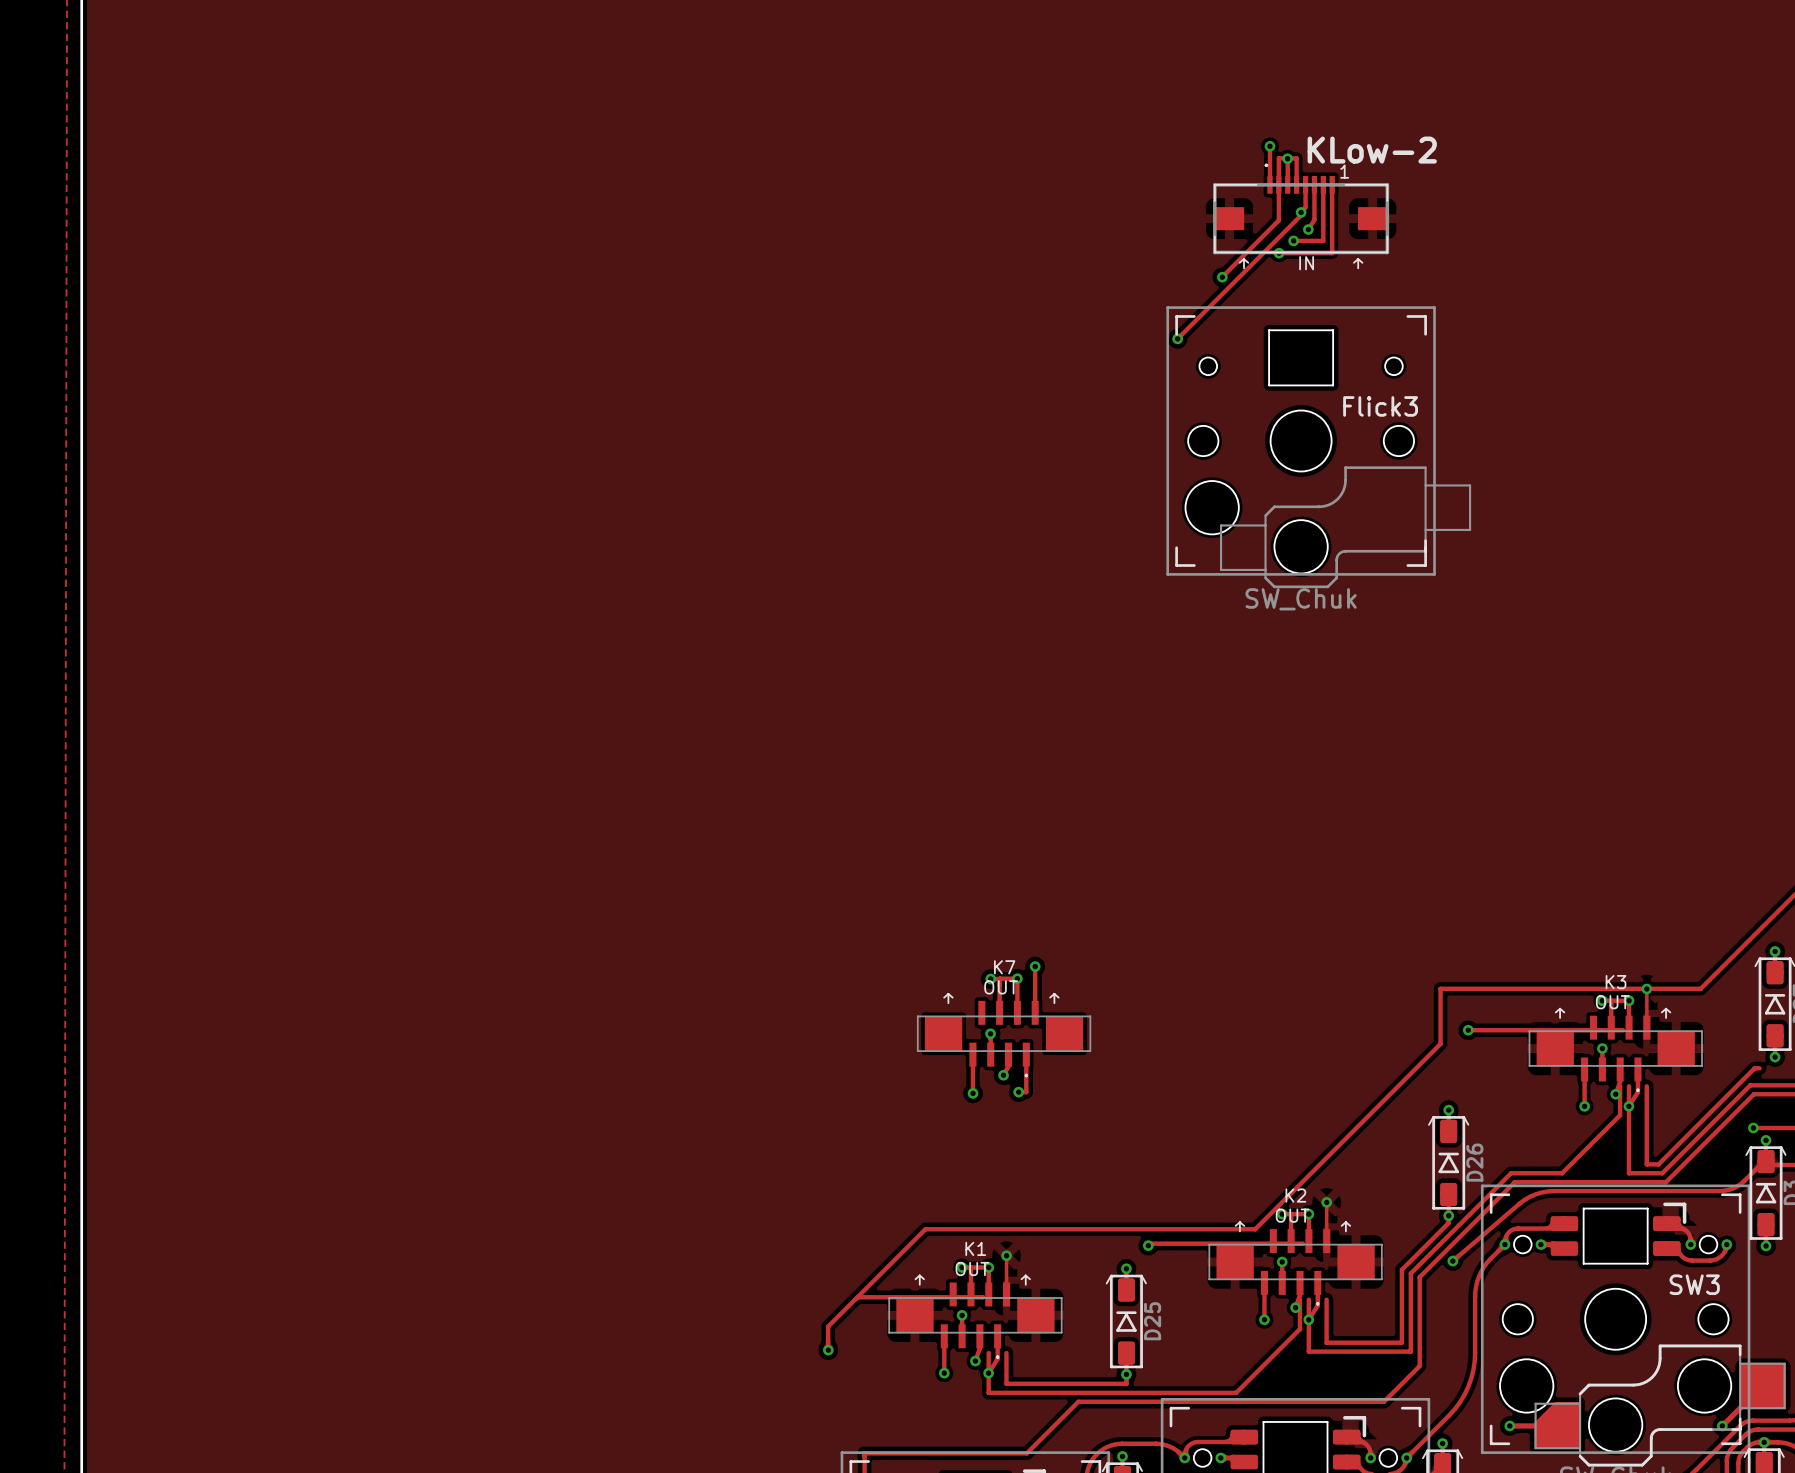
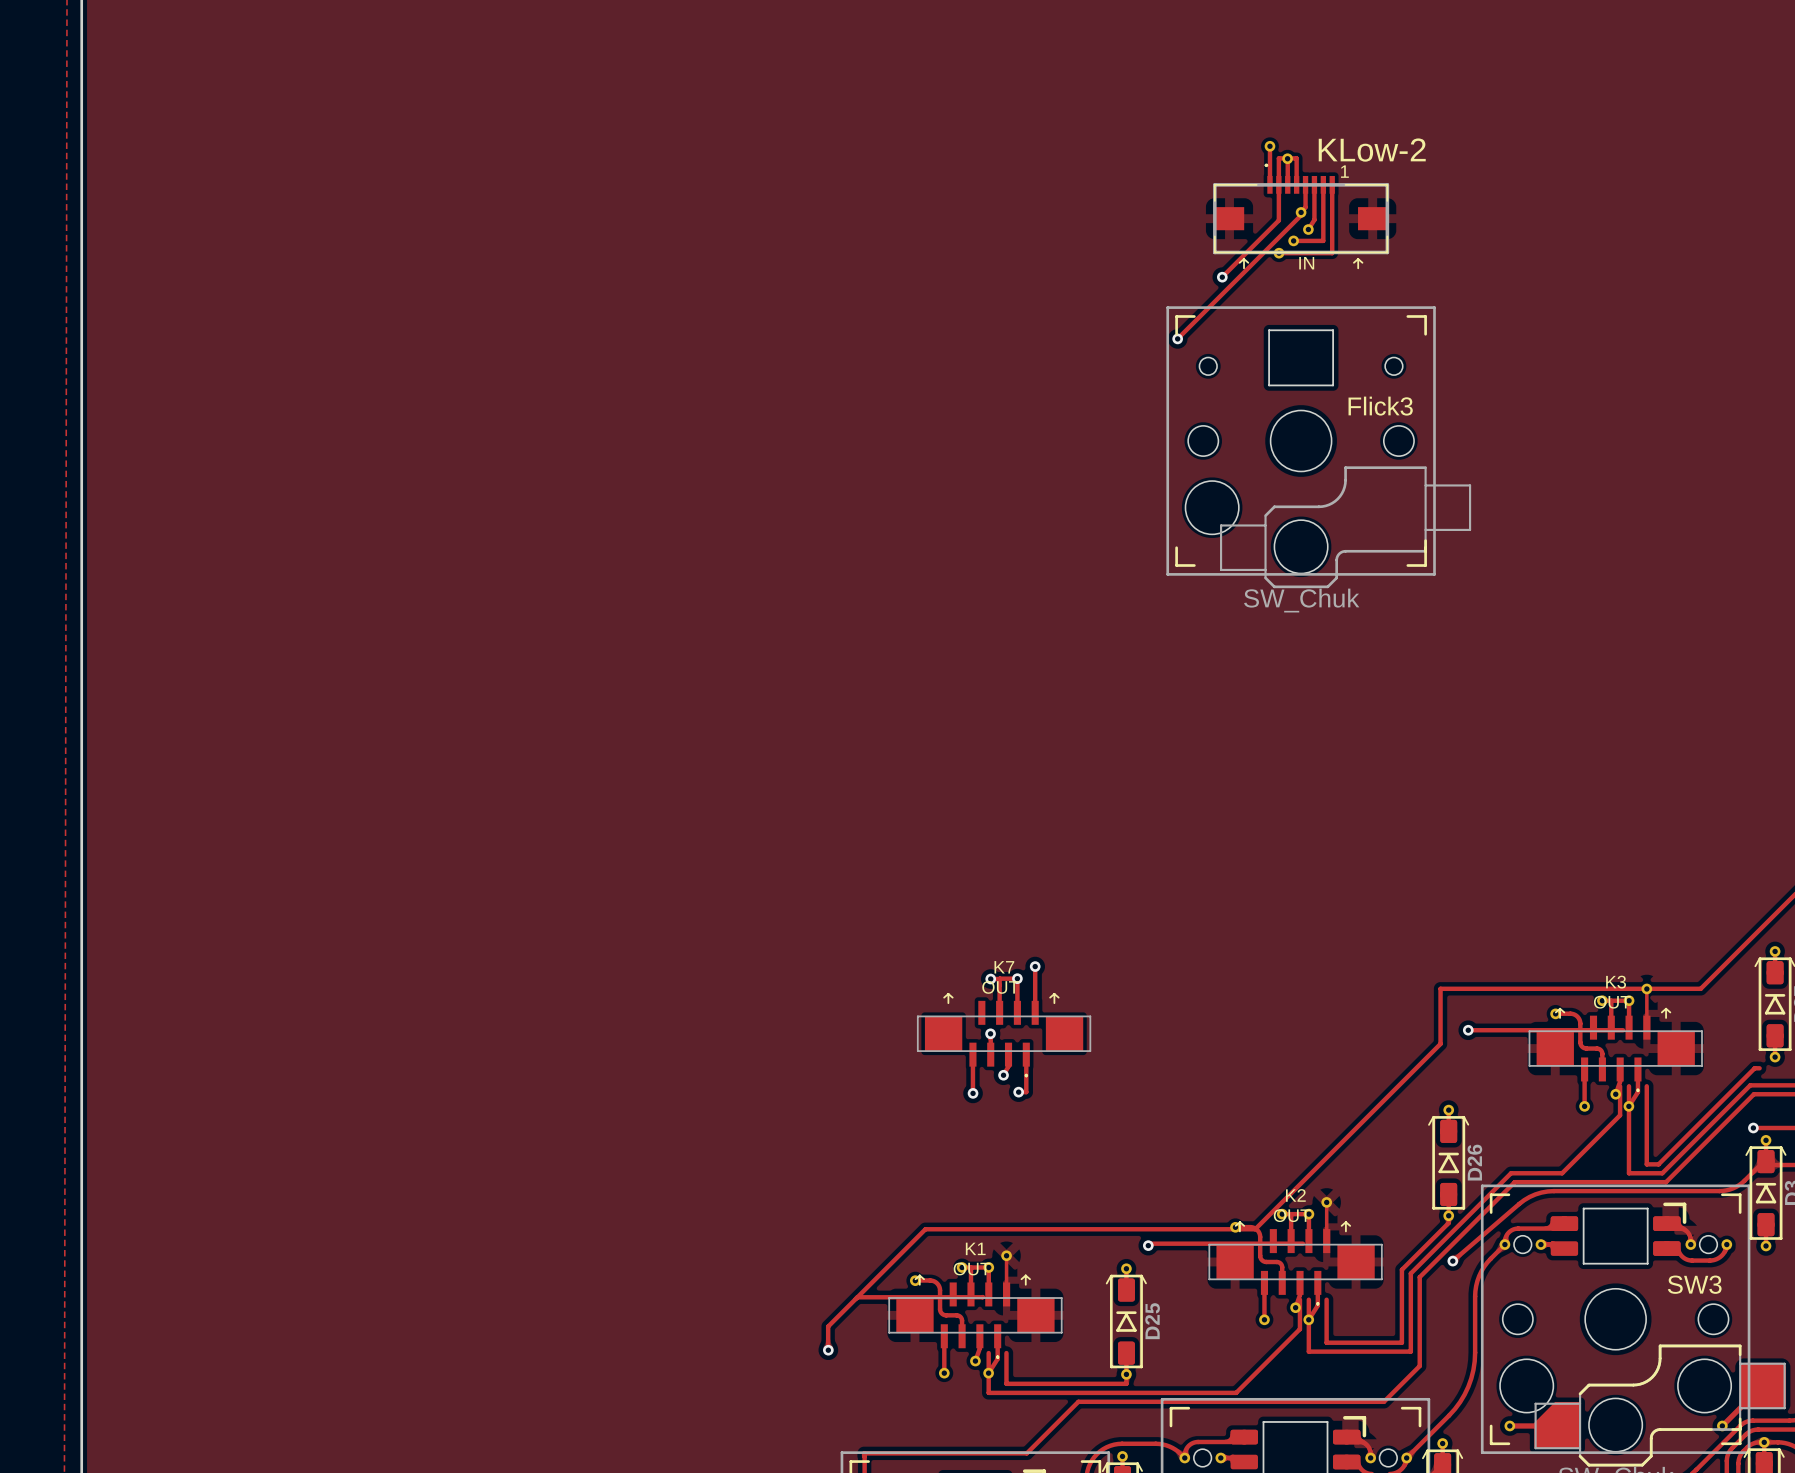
K3 footprint: [1528, 983, 1703, 1112] -> [1528, 983, 1703, 1112]
K2 footprint: [1208, 1197, 1383, 1326] -> [1208, 1197, 1383, 1326]
K1 footprint: [888, 1250, 1063, 1379] -> [888, 1250, 1063, 1379]

